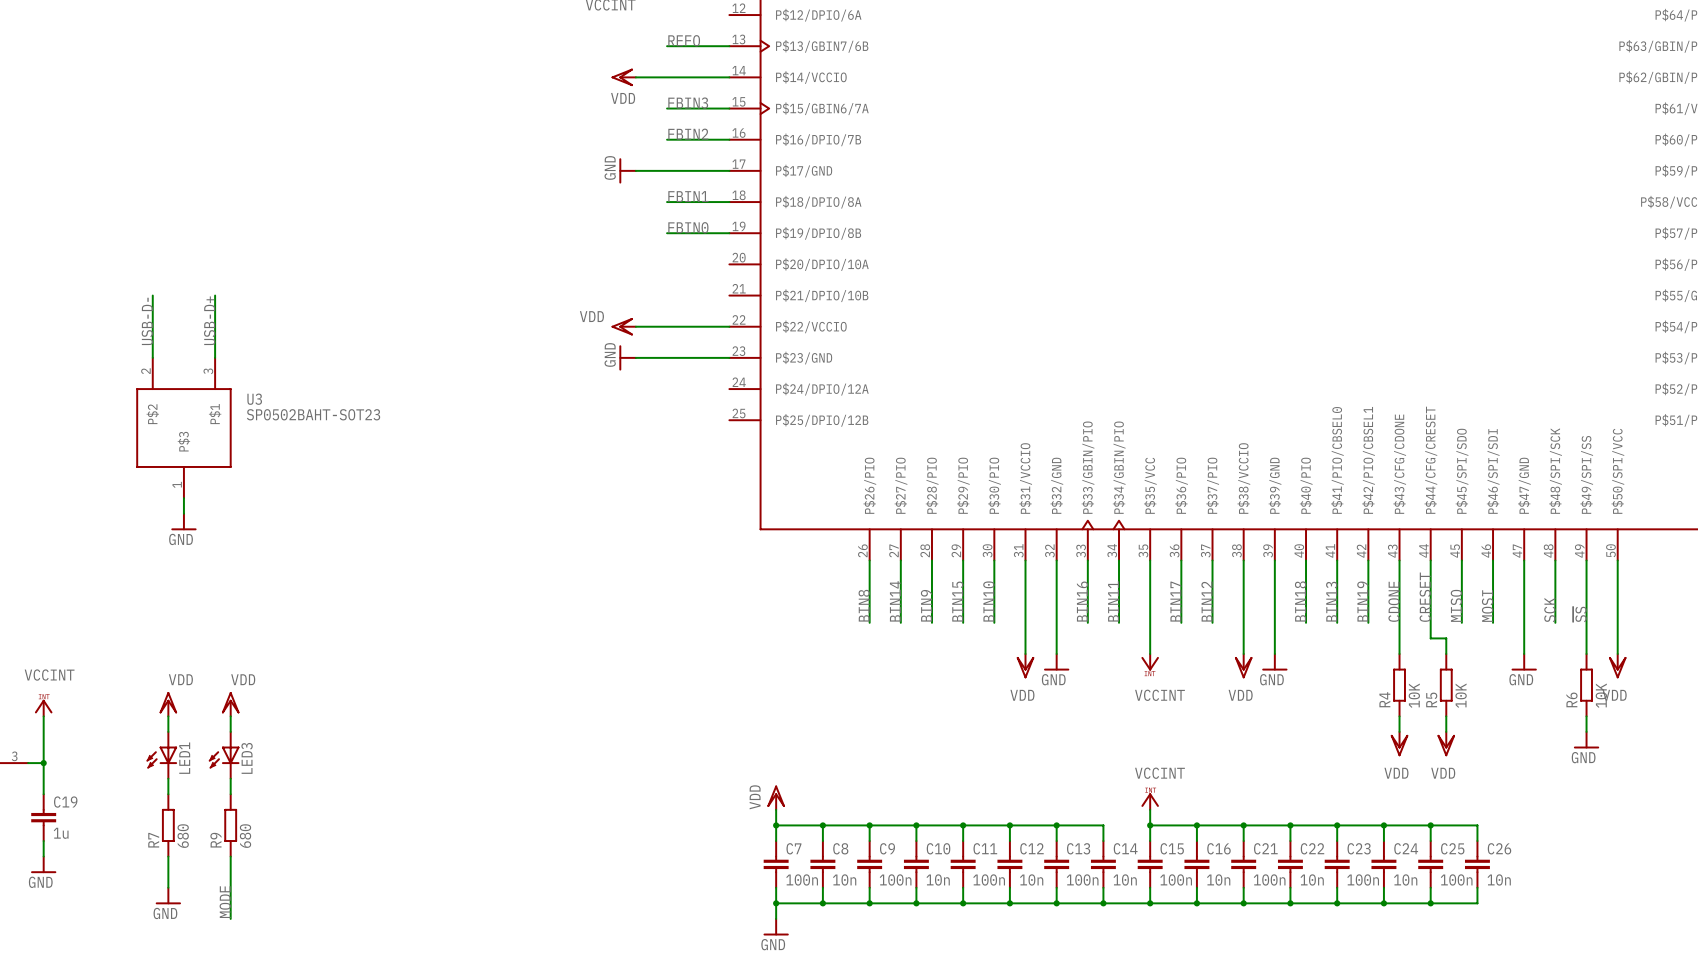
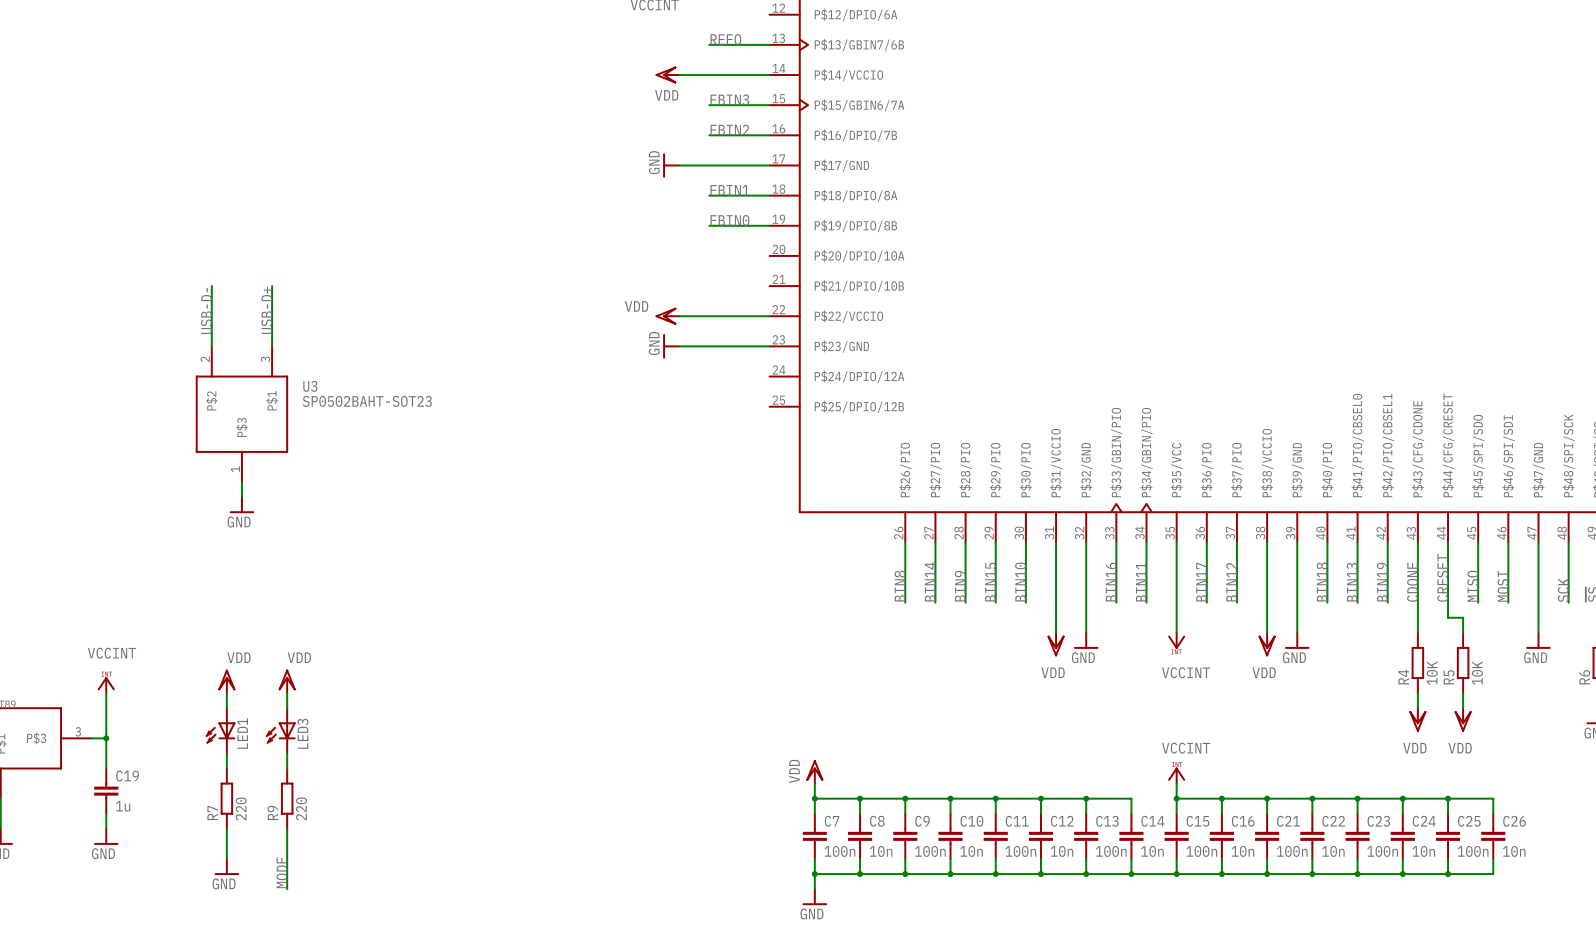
R7 value: 680 (183, 836) -> 220 (241, 808)
R9 value: 680 (245, 836) -> 220 (301, 808)

